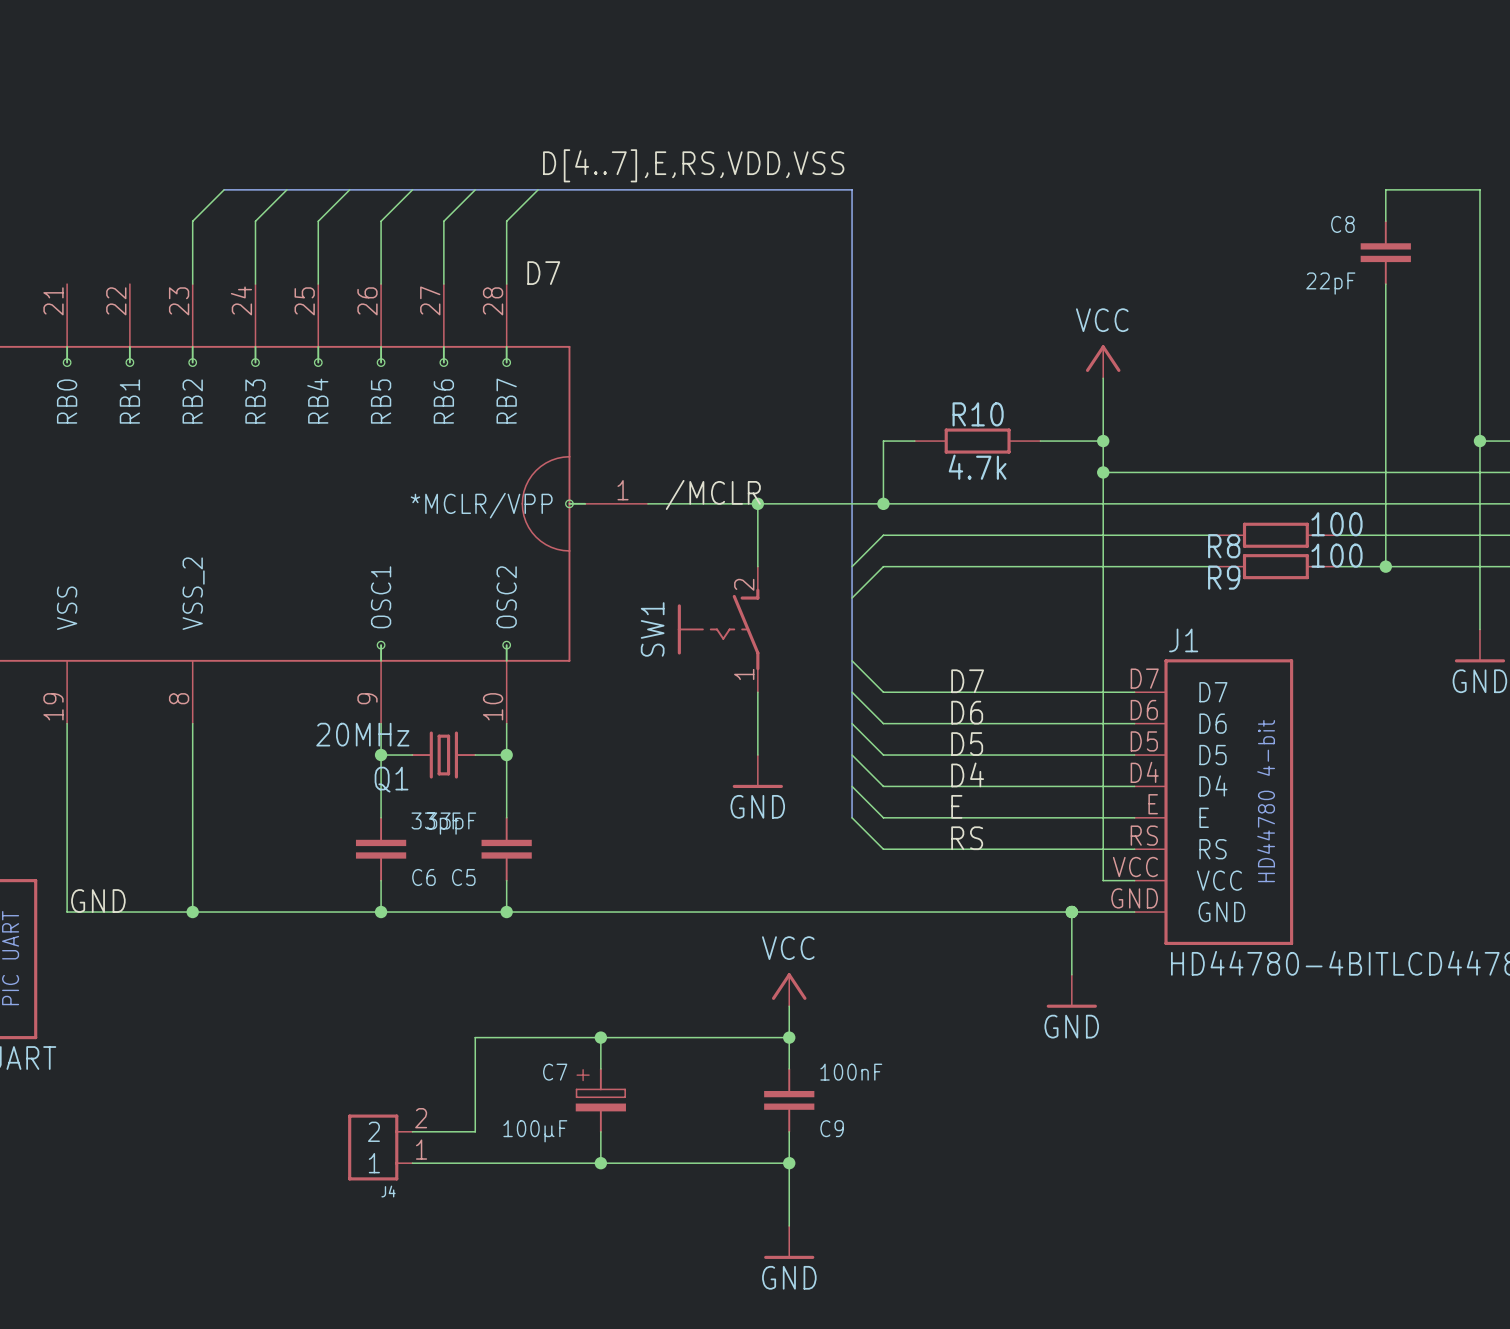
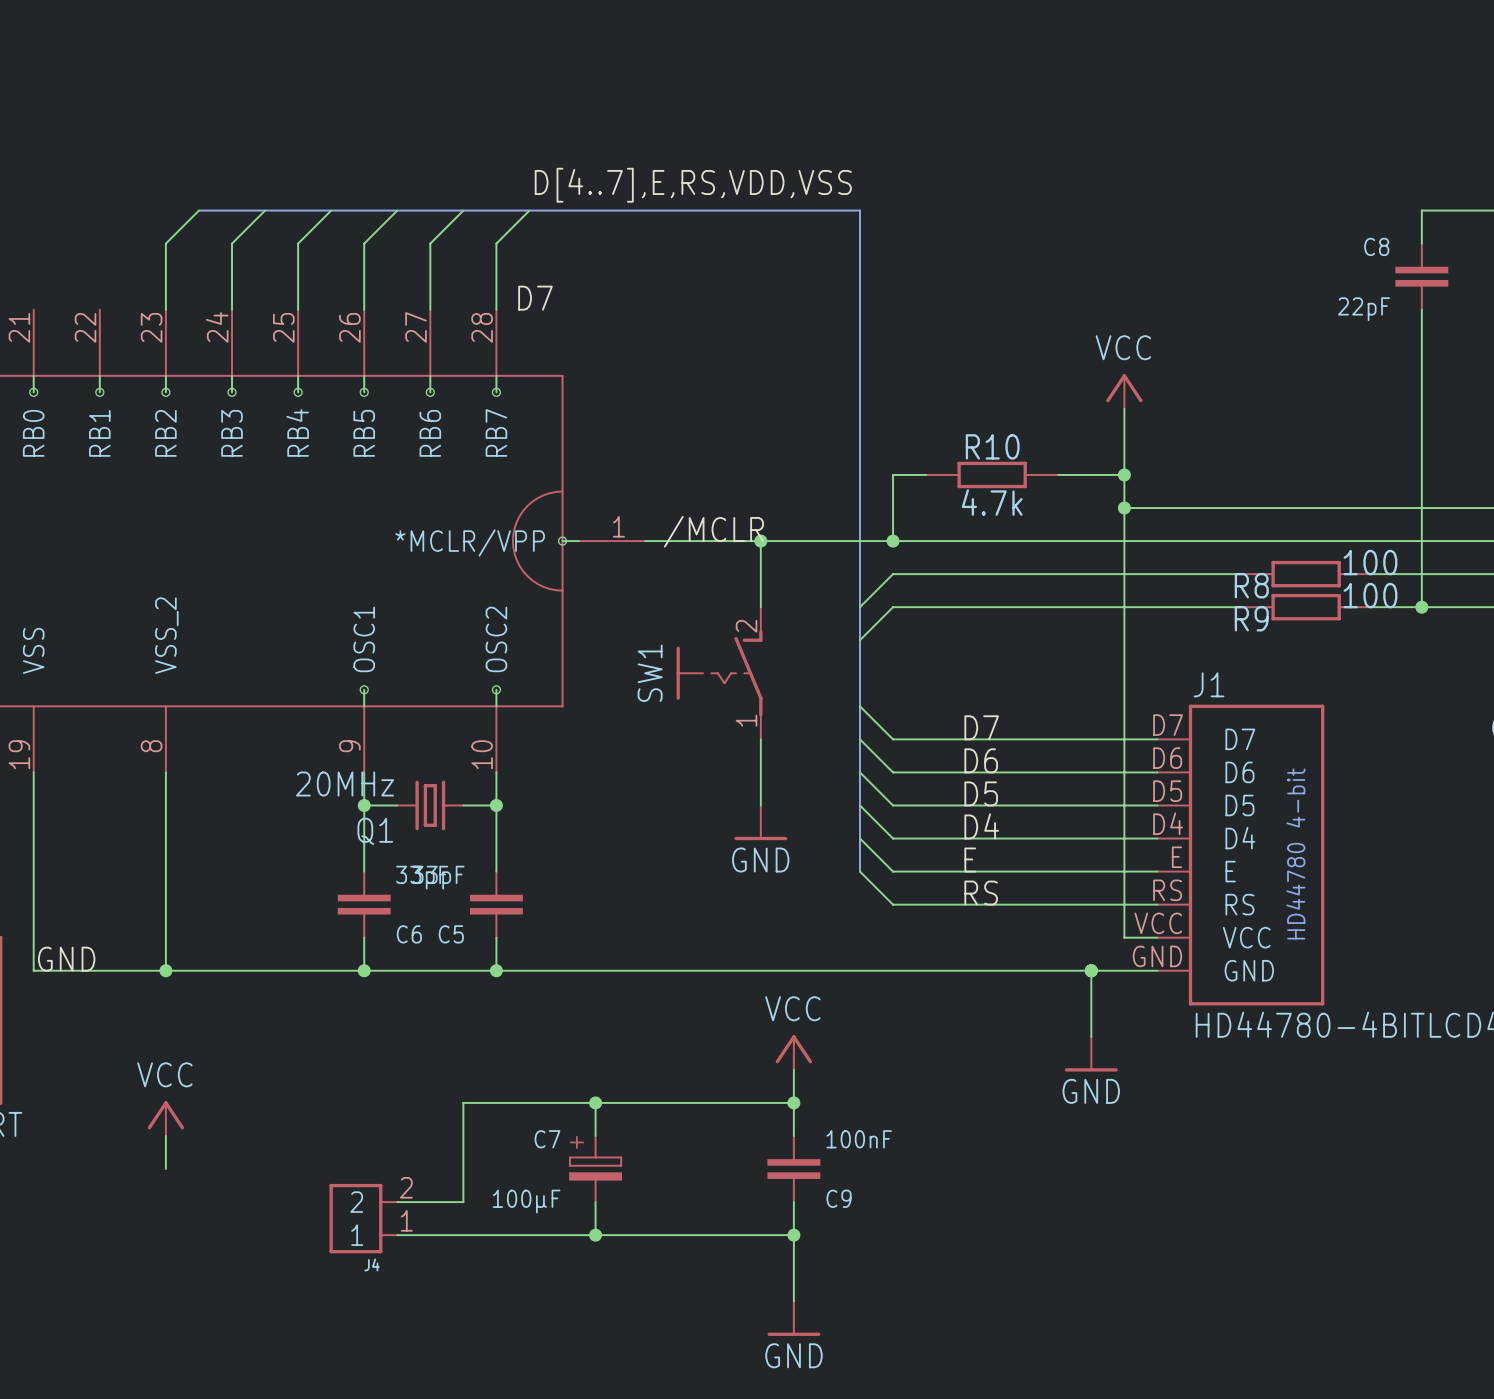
power symbol: none -> VCC (165, 1118)
wire: none -> (165, 1135) (165, 1169)

